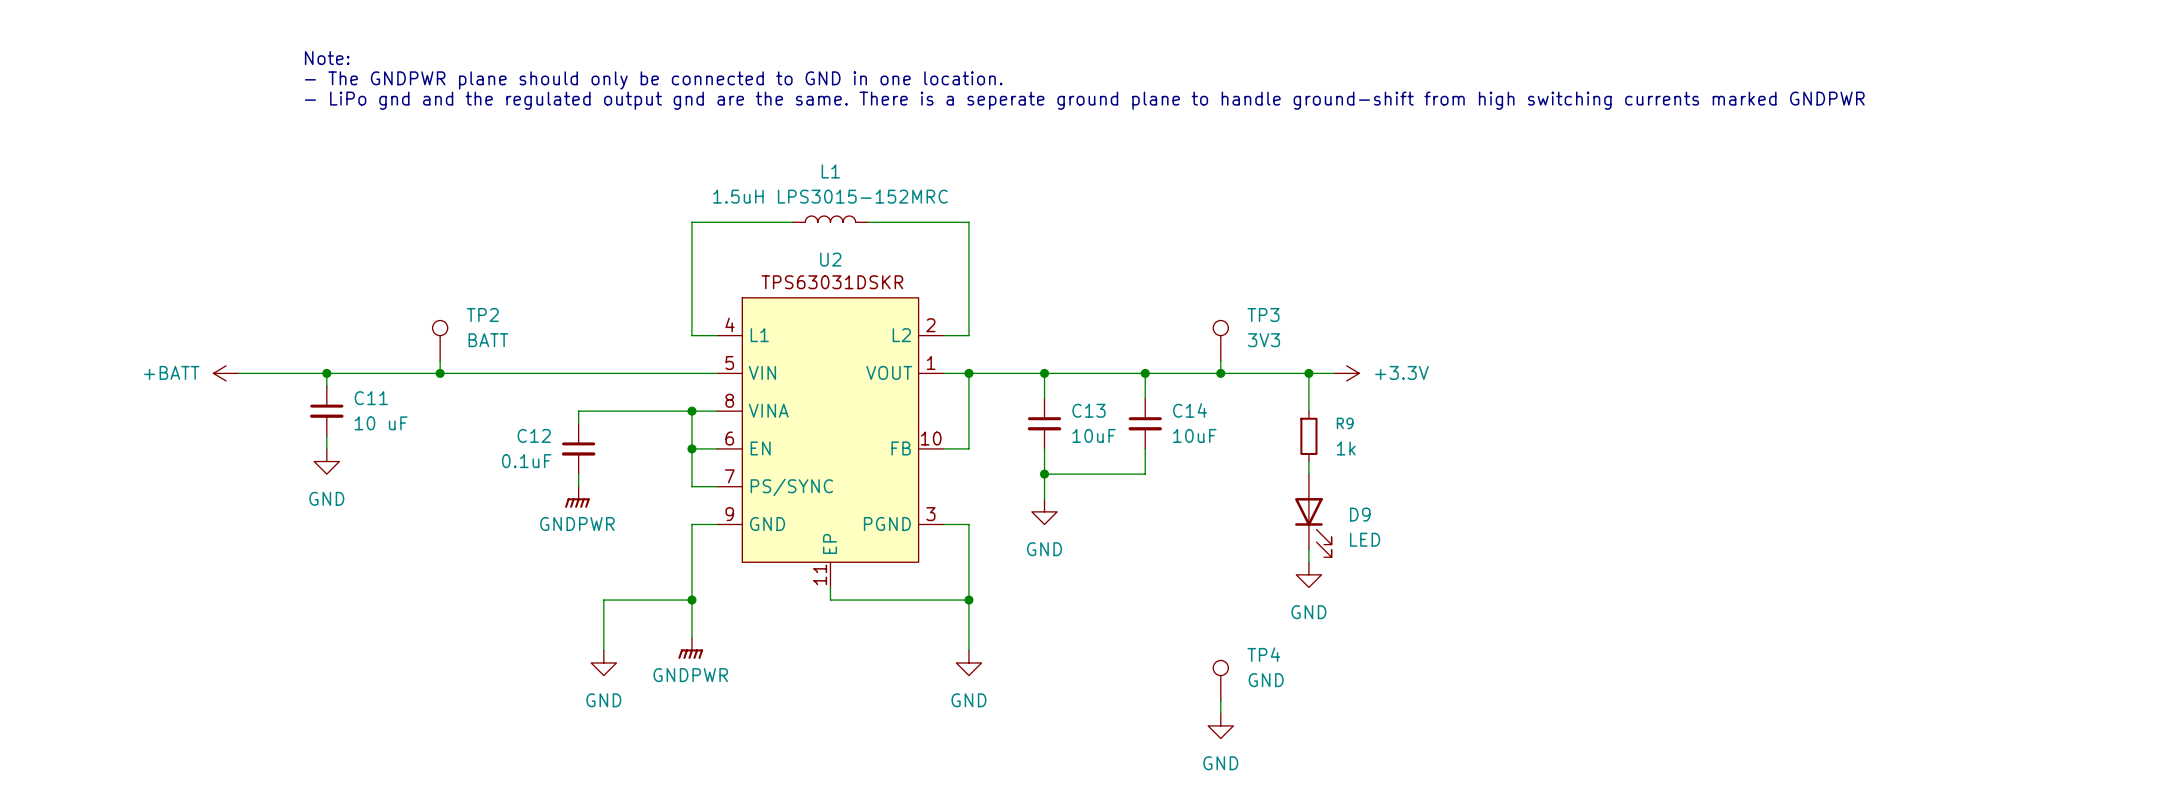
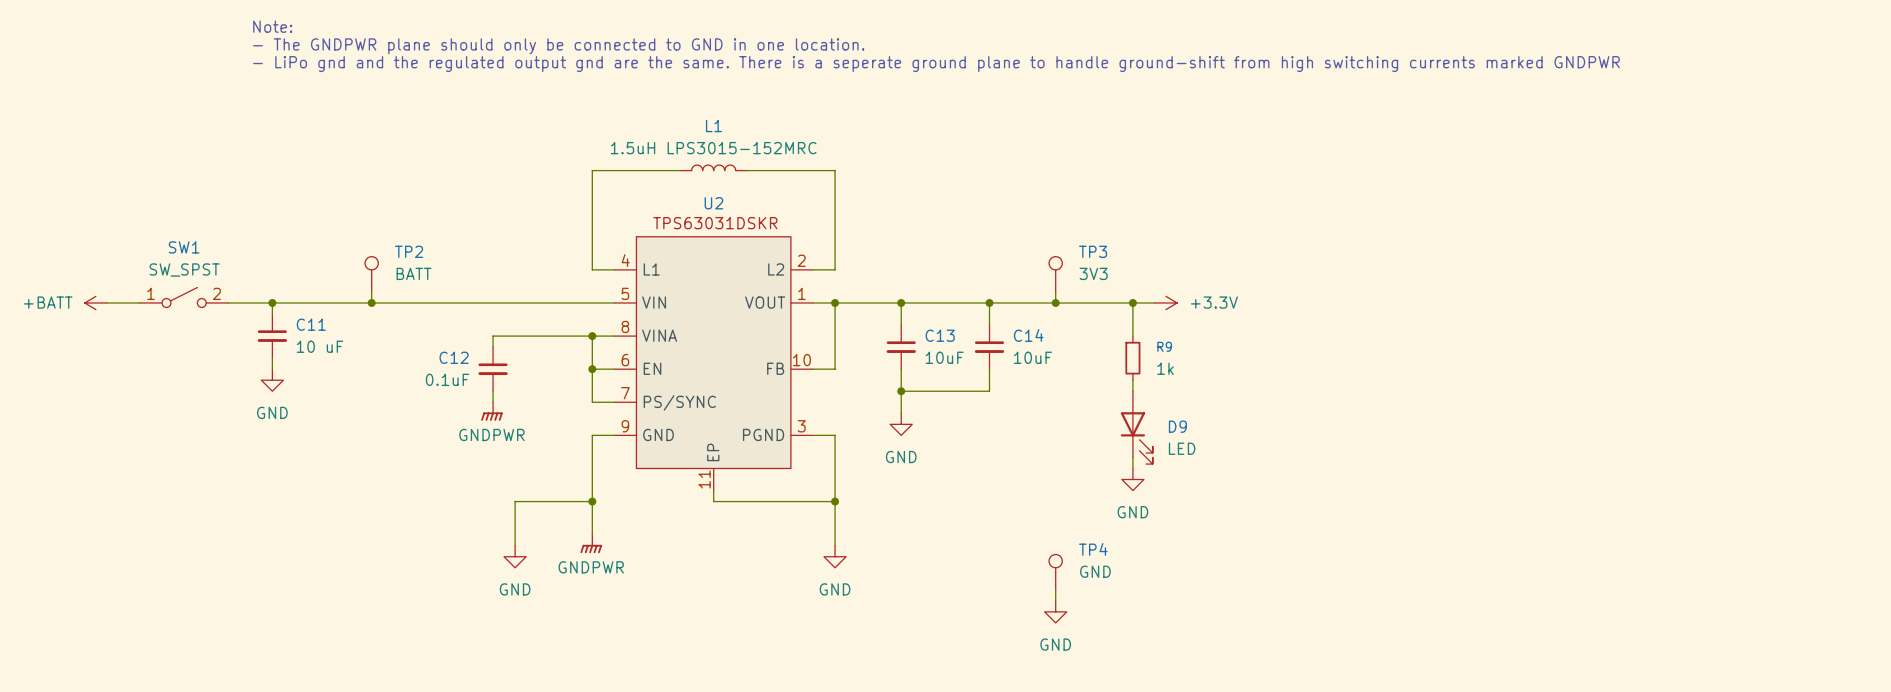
SW1: none -> SW_SPST (184, 297)
power symbol position: +BATT (226, 373) -> +BATT (95, 302)

